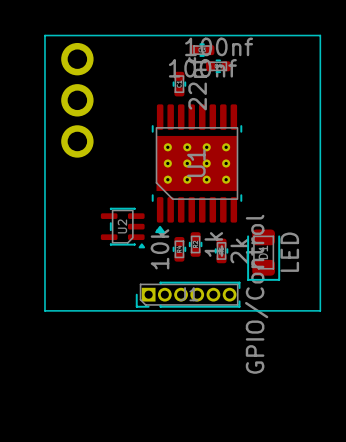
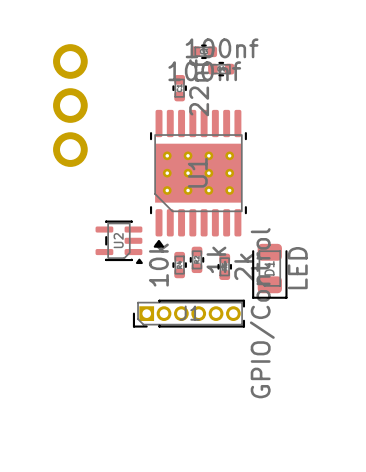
line: (44, 35) (320, 35) (320, 310) (44, 310) (44, 35) -> none

